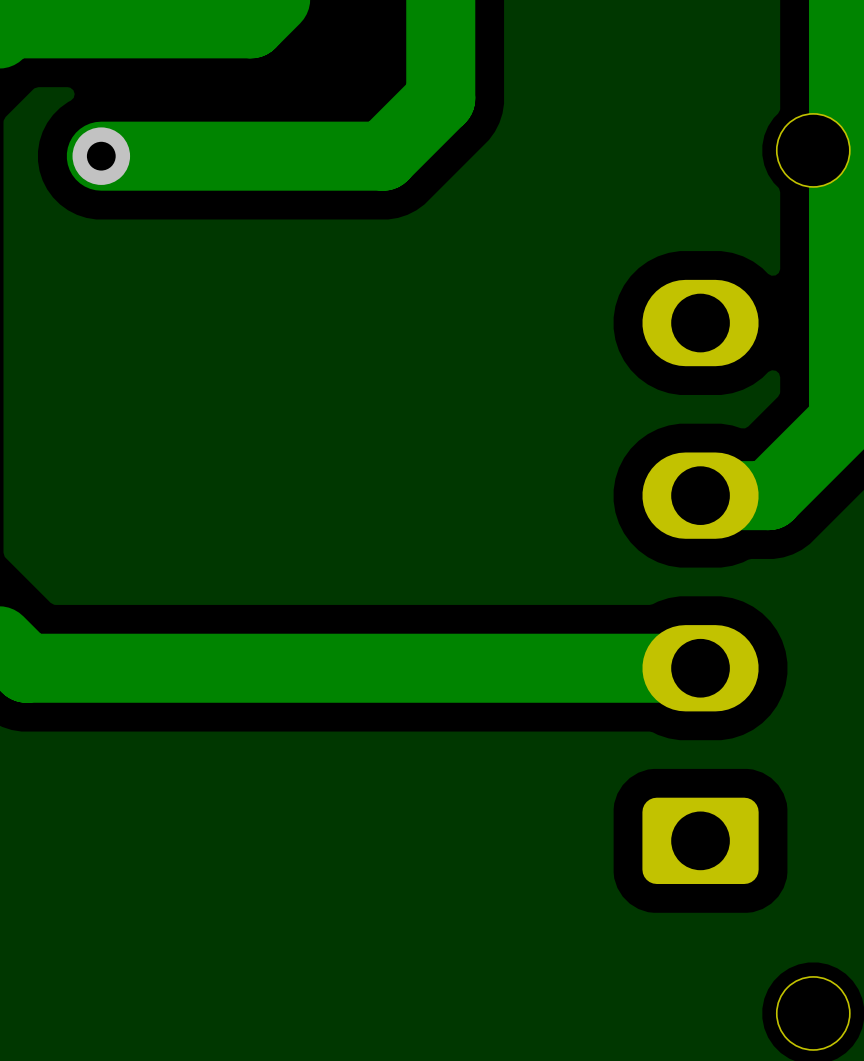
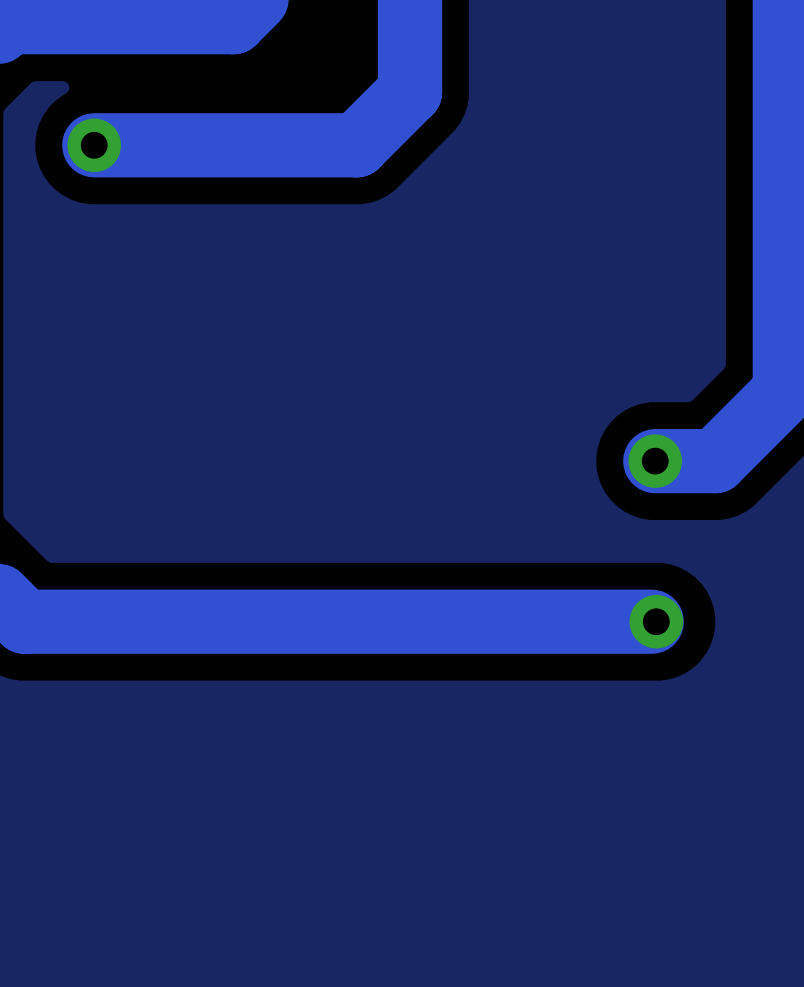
via: none -> (655, 461)
part: (746, 581) -> none
via: none -> (656, 621)

